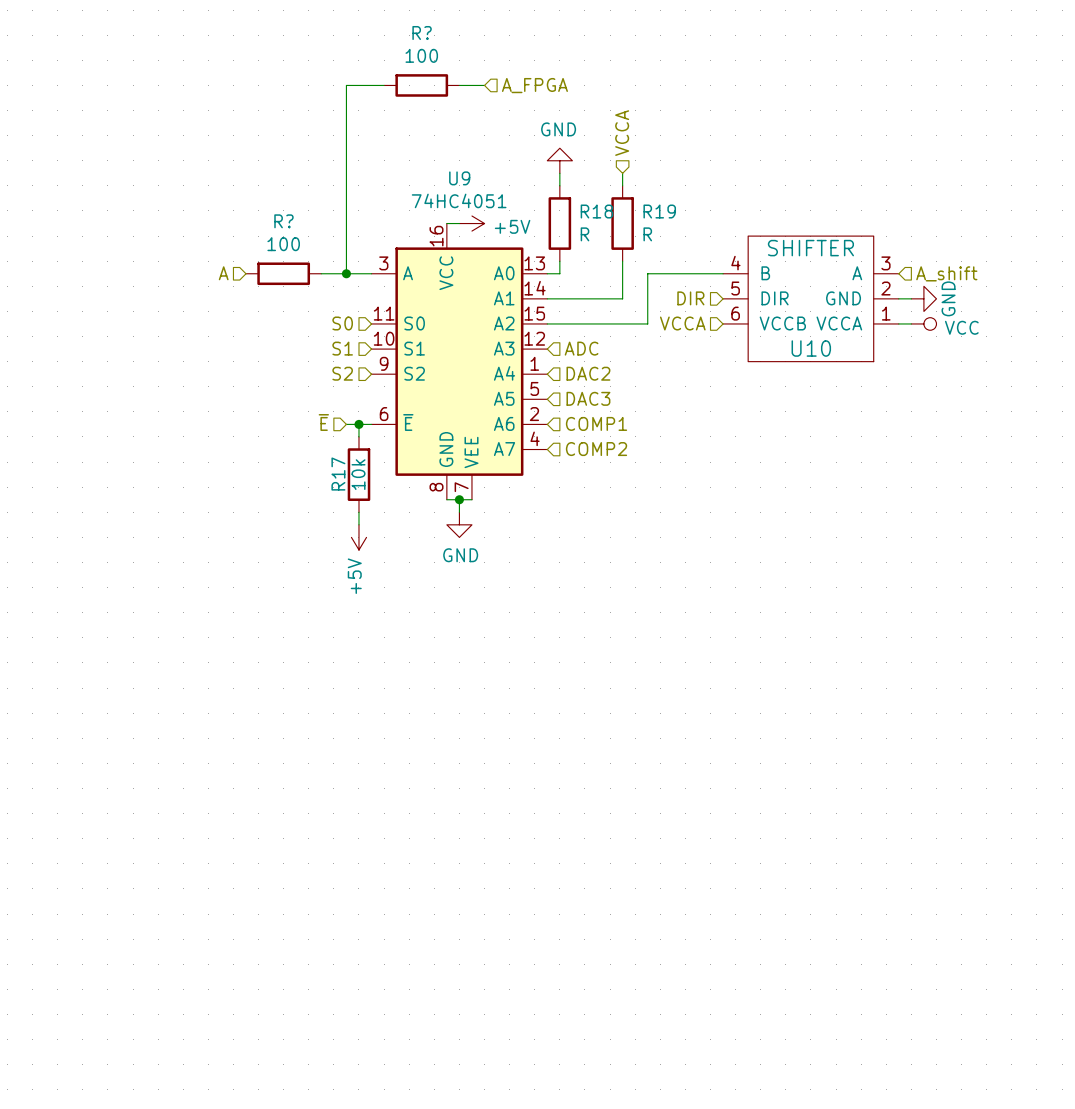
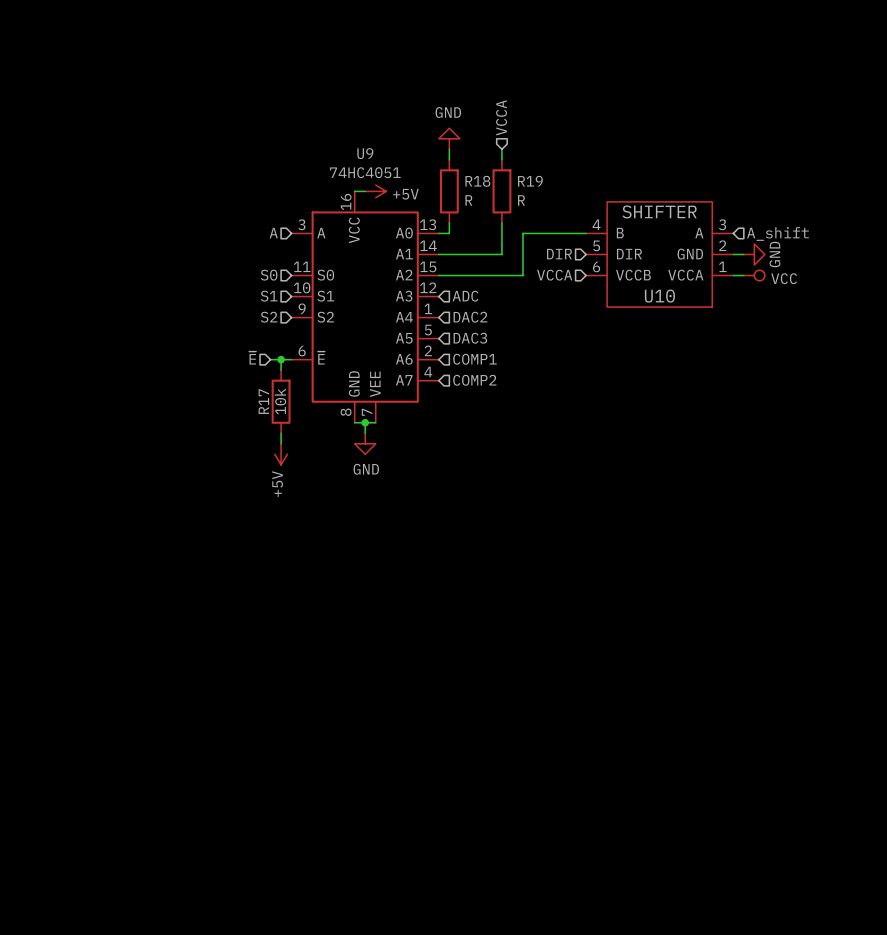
wire: (384, 85) (346, 85) (346, 273) -> none
R?: 100 (421, 85) -> none
wire: (459, 85) (484, 85) -> none
hierarchical label: A_FPGA (534, 85) -> none
hierarchical label position: A (223, 273) -> A (273, 233)
R?: 100 (283, 273) -> none
wire: (321, 273) (371, 273) -> none
junction: (346, 273) -> none

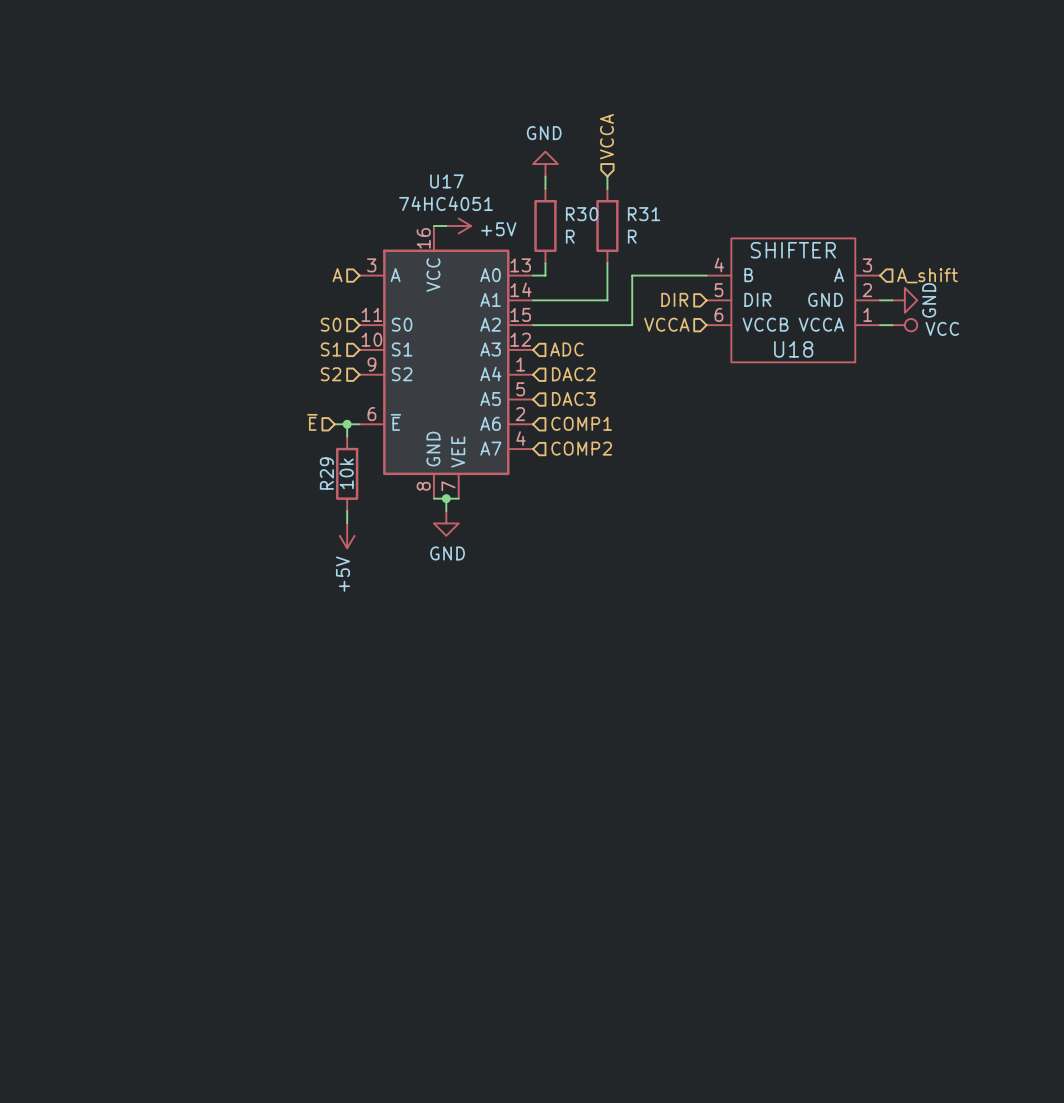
U9 name: U9 (365, 153) -> U17 (446, 181)
R18 name: R18 (477, 181) -> R30 (582, 214)
R19 name: R19 (530, 181) -> R31 (644, 214)
U10 name: U10 (659, 296) -> U18 (793, 349)
R17 name: R17 (263, 401) -> R29 (326, 473)

